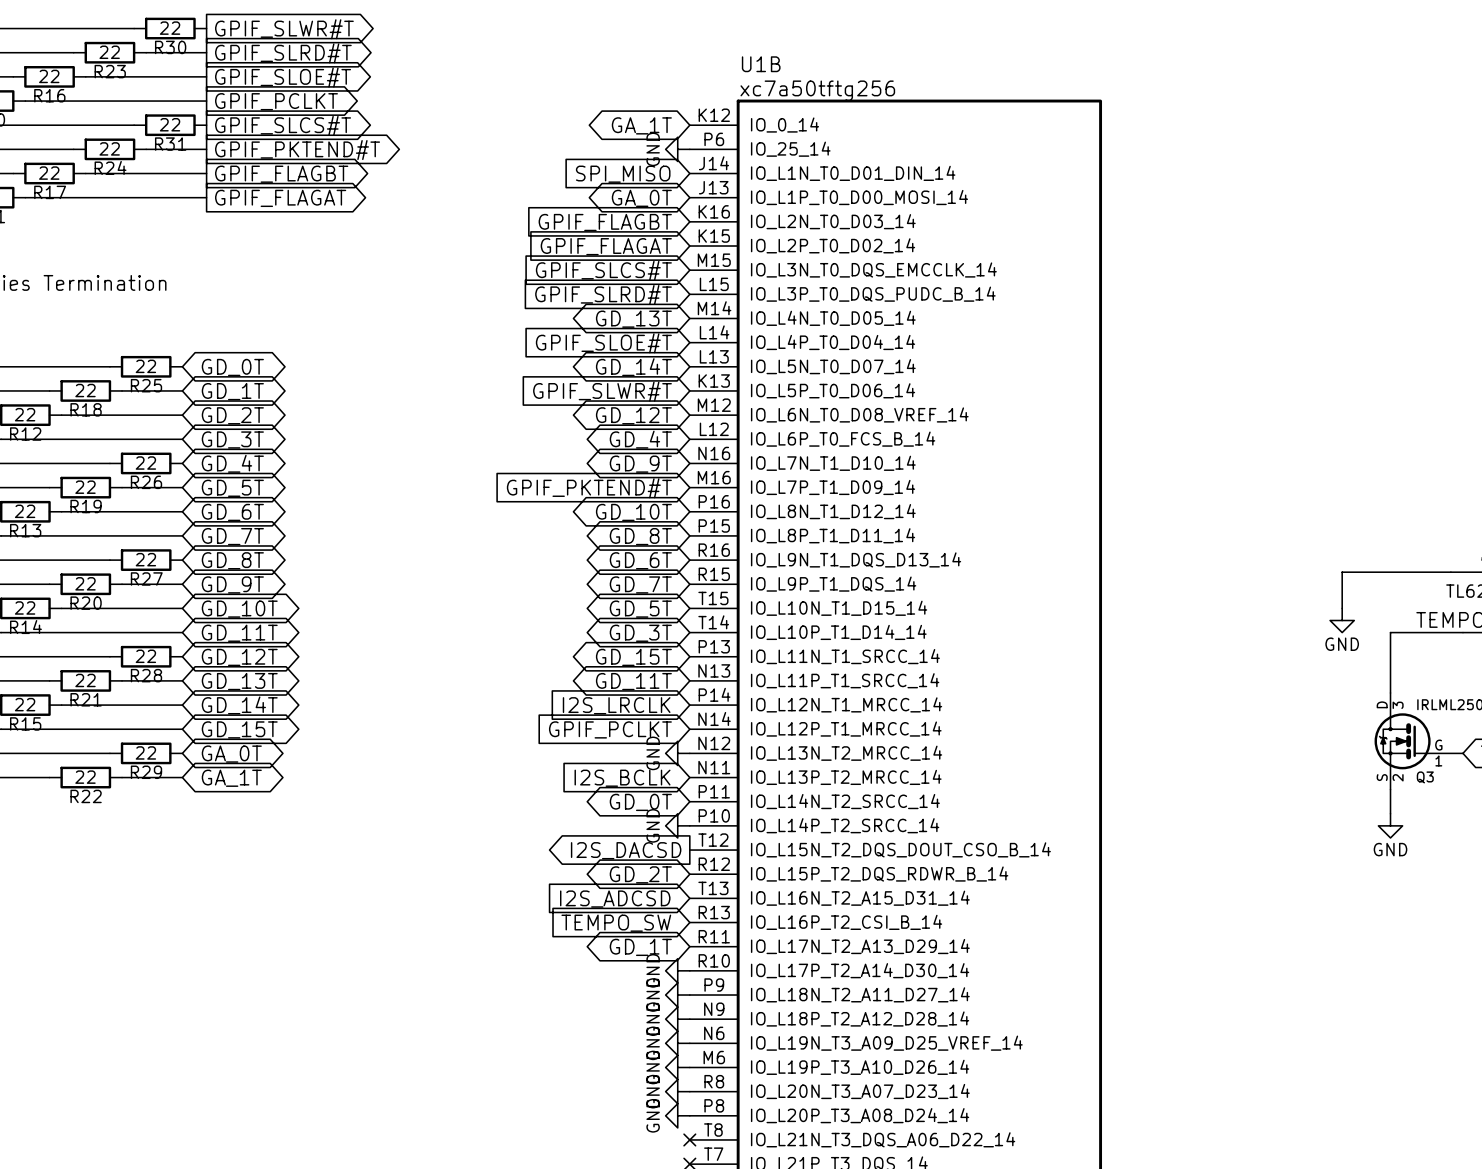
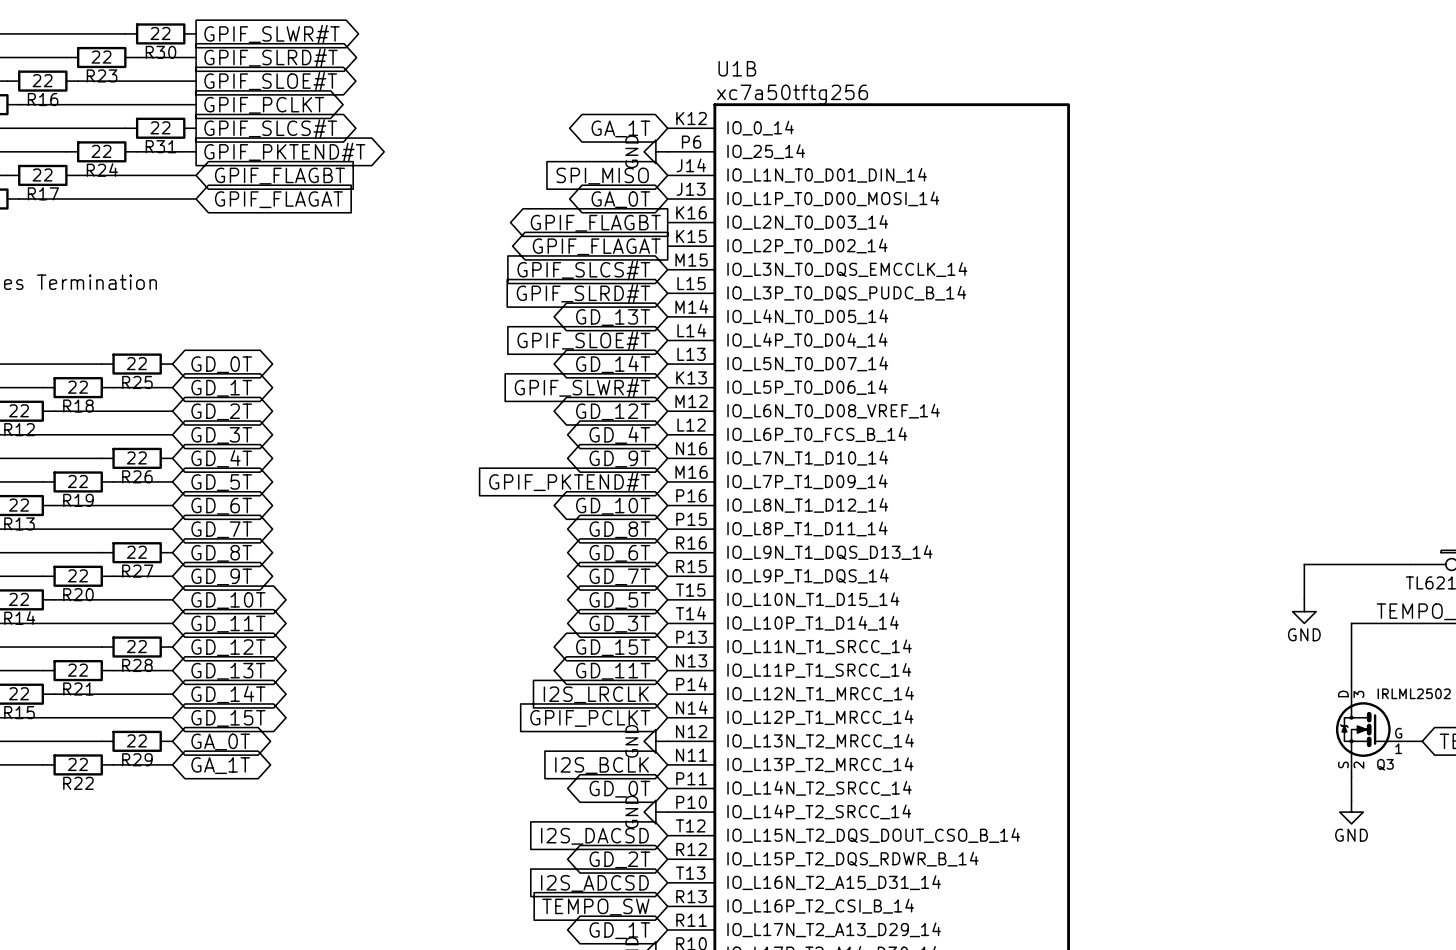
global label shape: output (281, 174) -> input (279, 176)
global label shape: output (280, 198) -> input (278, 199)
global label shape: input (605, 222) -> output (595, 223)
global label shape: input (606, 246) -> output (596, 246)
global label shape: output (626, 850) -> input (594, 836)

